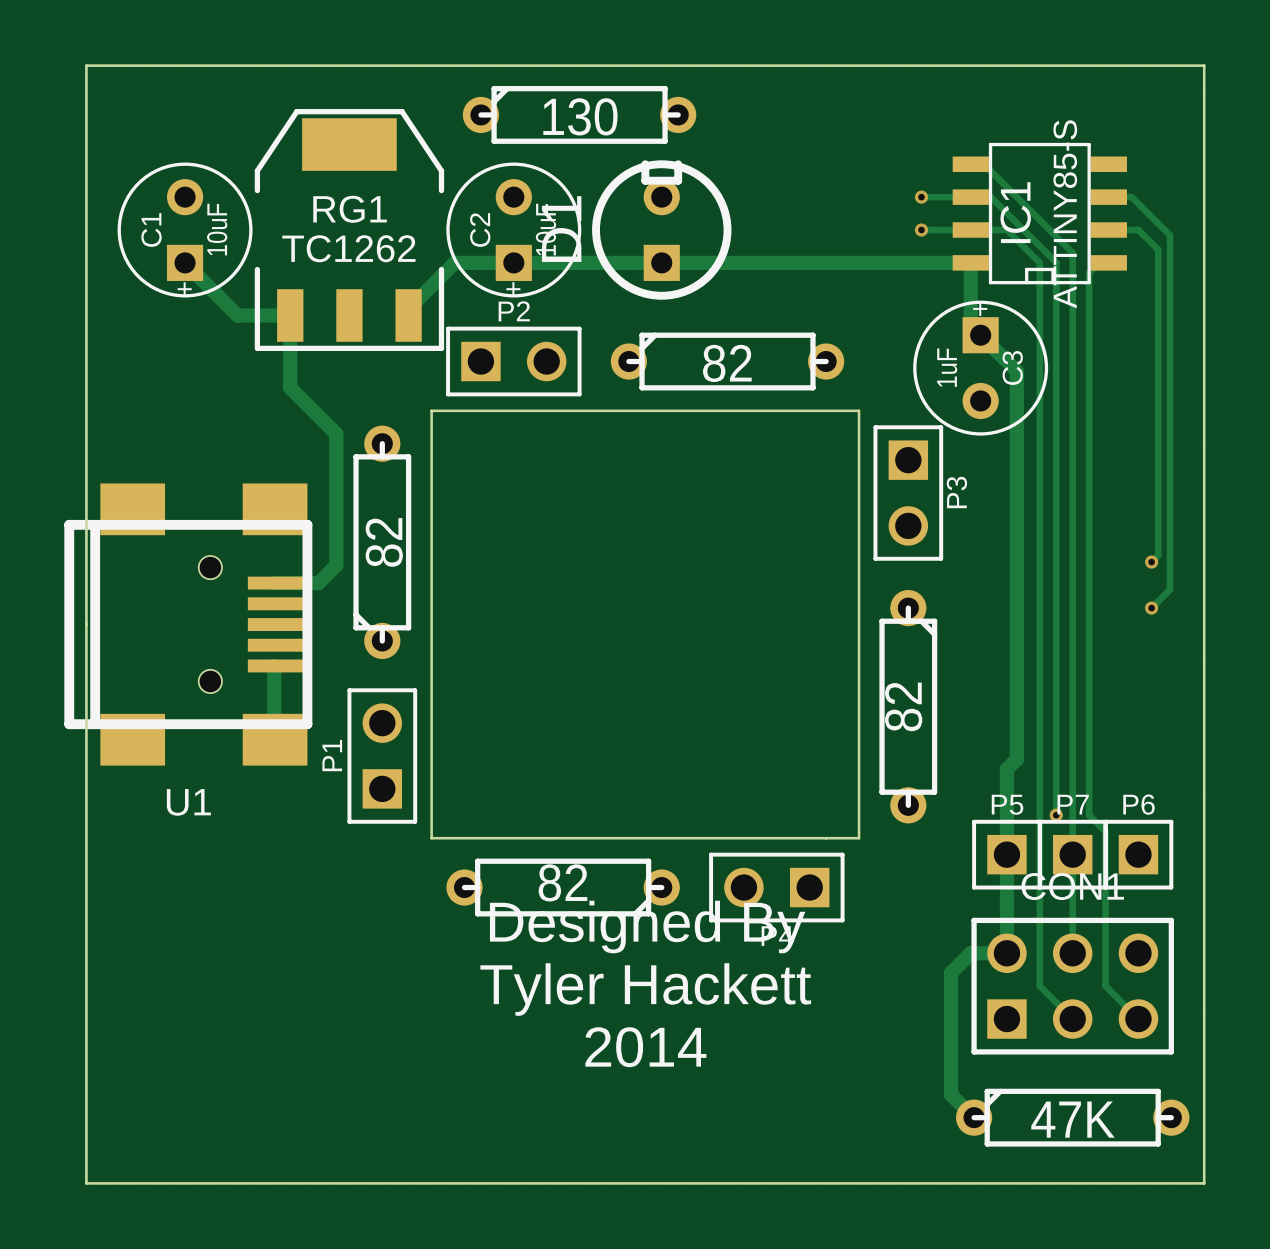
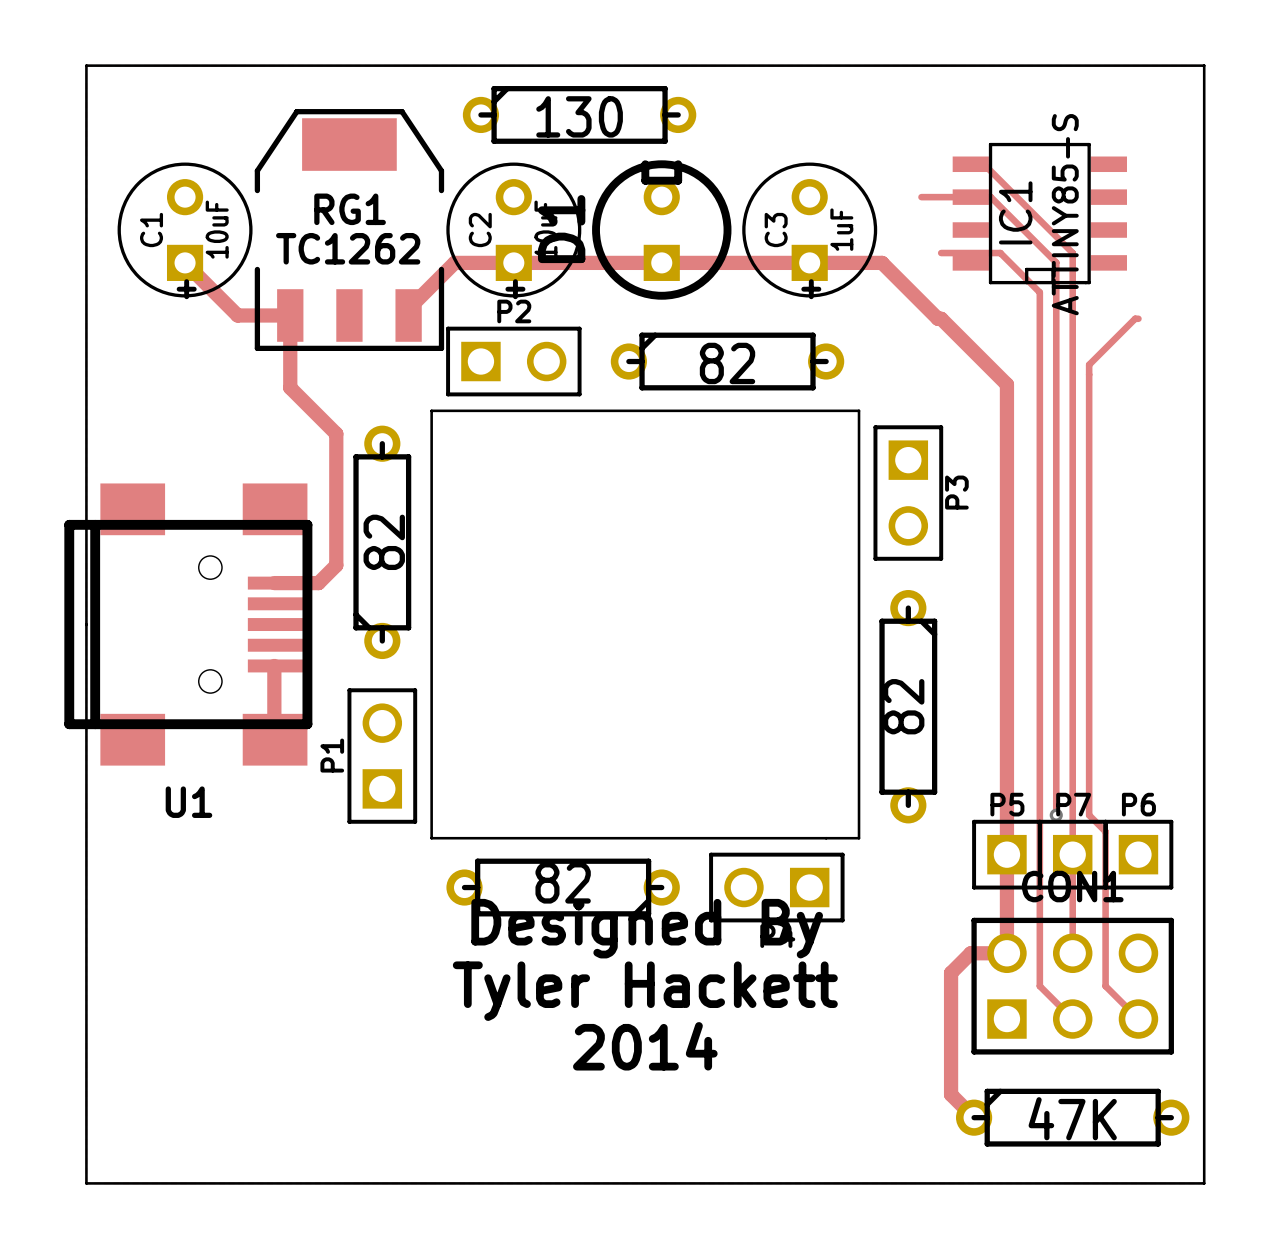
via: (921, 197) -> none
track: (1108, 197) (1131, 197) (1170, 235) (1170, 589) (1151, 608) -> none
track: (921, 230) (1006, 230) (1039, 262) (1039, 292) -> (941, 253) (1000, 253) (1039, 292)
via: (921, 230) -> none
track: (1108, 230) (1138, 230) (1158, 249) (1158, 555) (1151, 562) -> none
track: (882, 262) (970, 262) (970, 325) (1016, 371) (1016, 759) (1006, 769) -> (882, 262) (1006, 384) (1006, 769)
track: (1108, 262) (1099, 262) (1089, 272) (1089, 364) -> (1138, 318) (1135, 318) (1089, 364)
C3 rotation: 0° (980, 368) -> 180° (809, 230)
C3 position: (980, 368) -> (809, 230)
via: (1151, 562) -> none
via: (1151, 608) -> none

